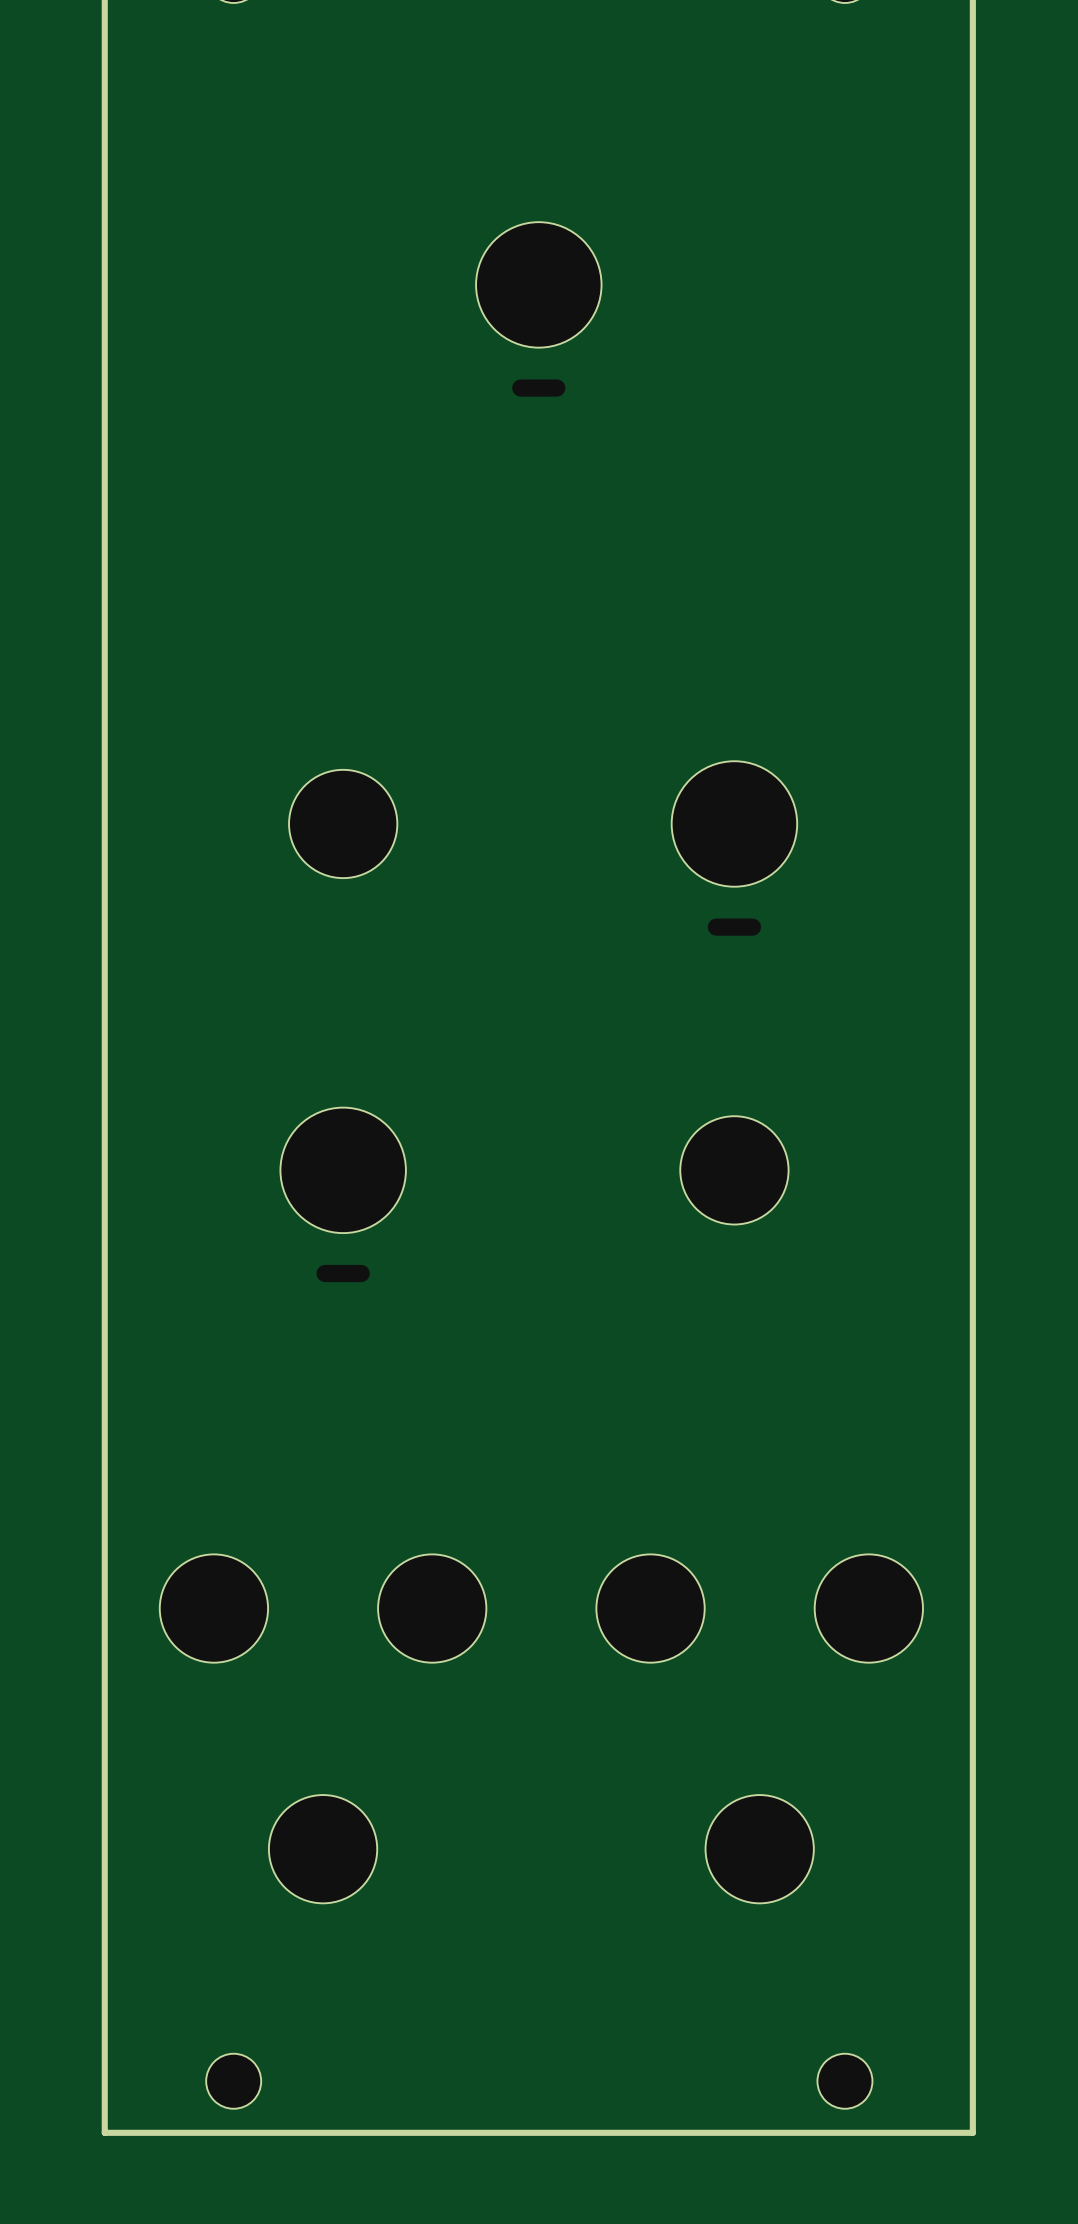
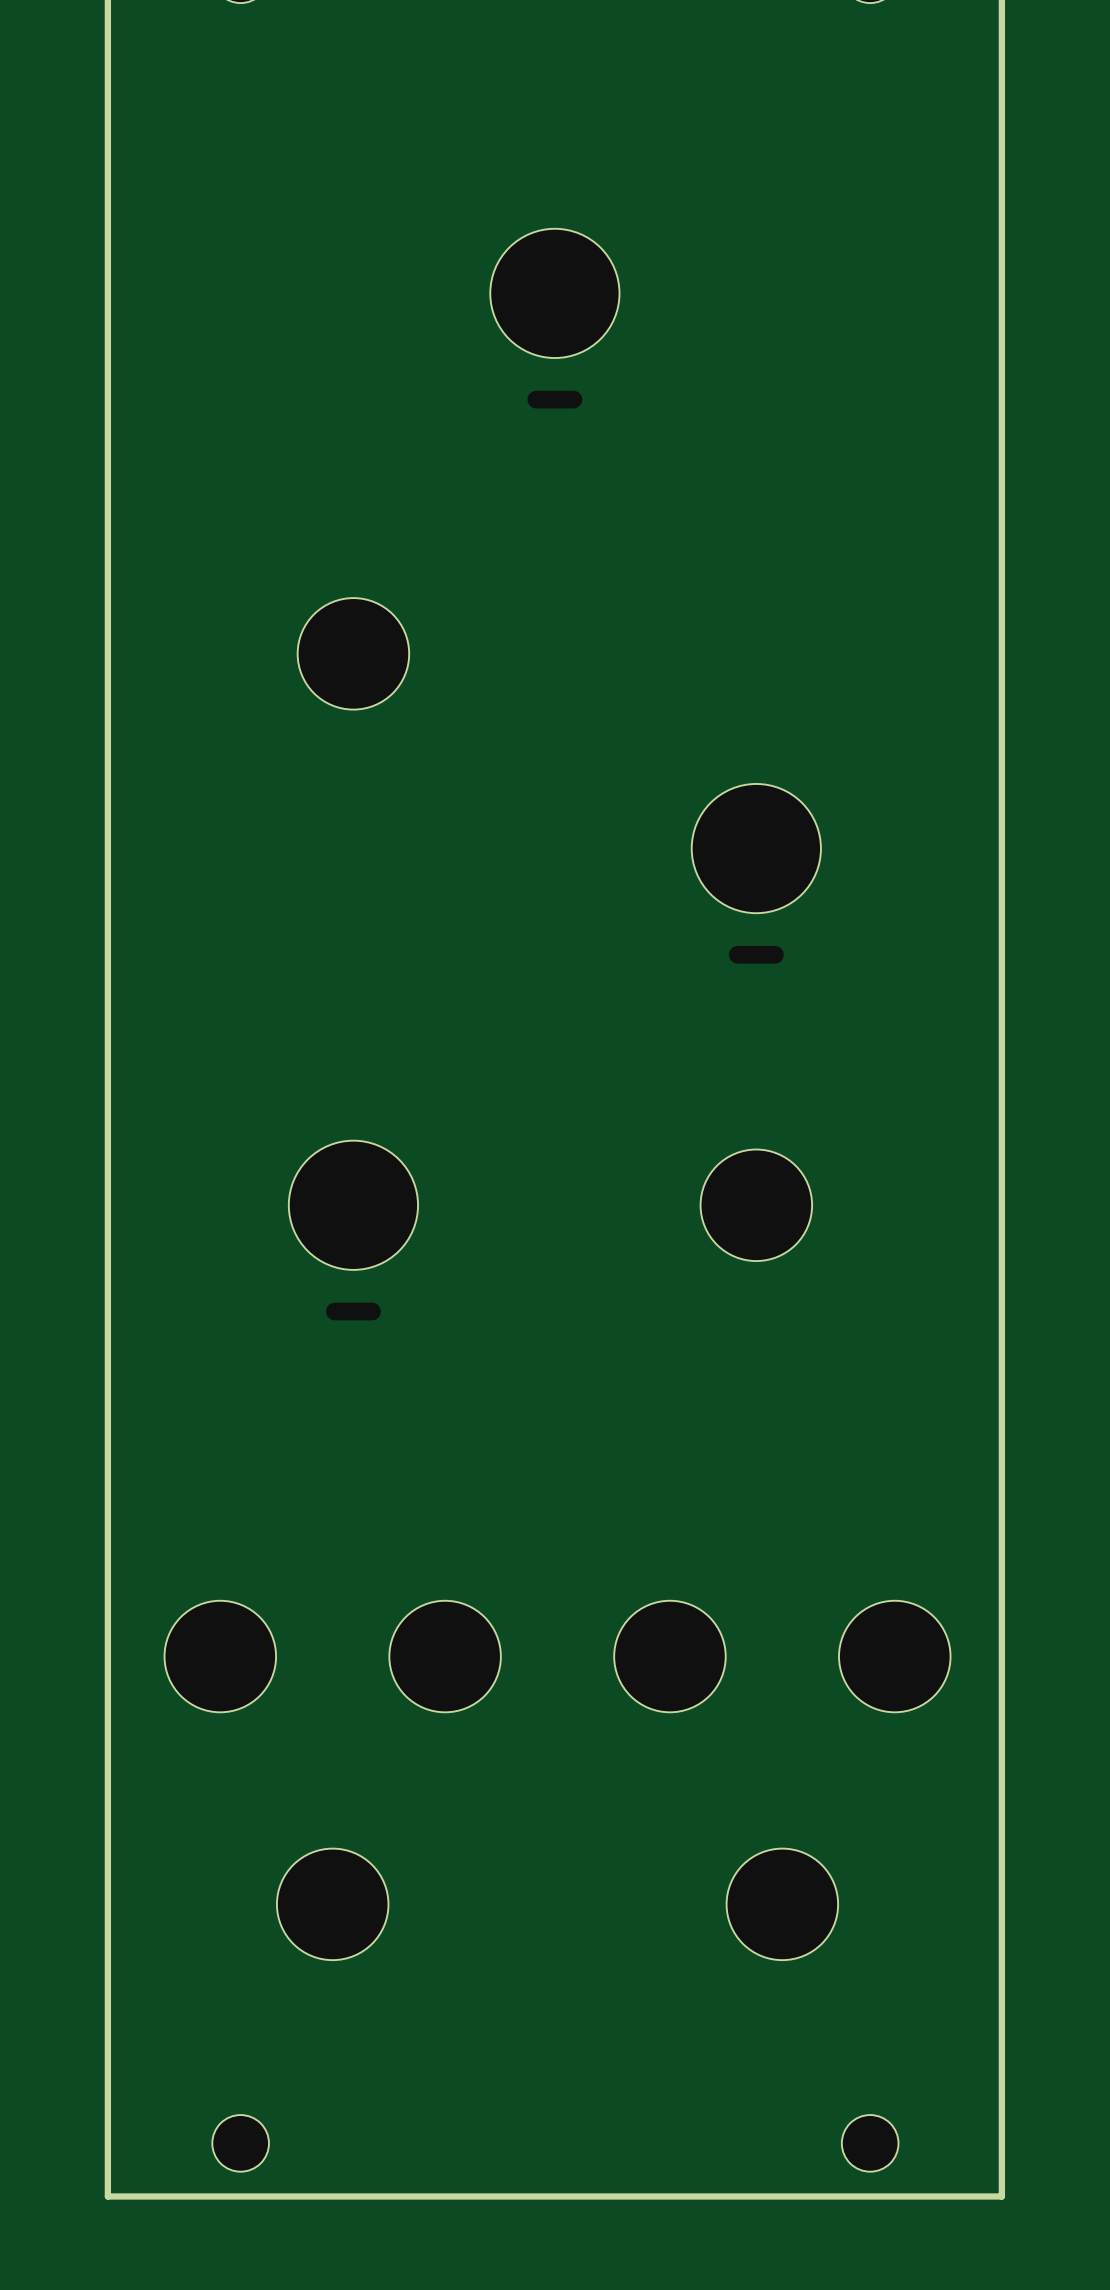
part position: (343, 823) -> (353, 653)

